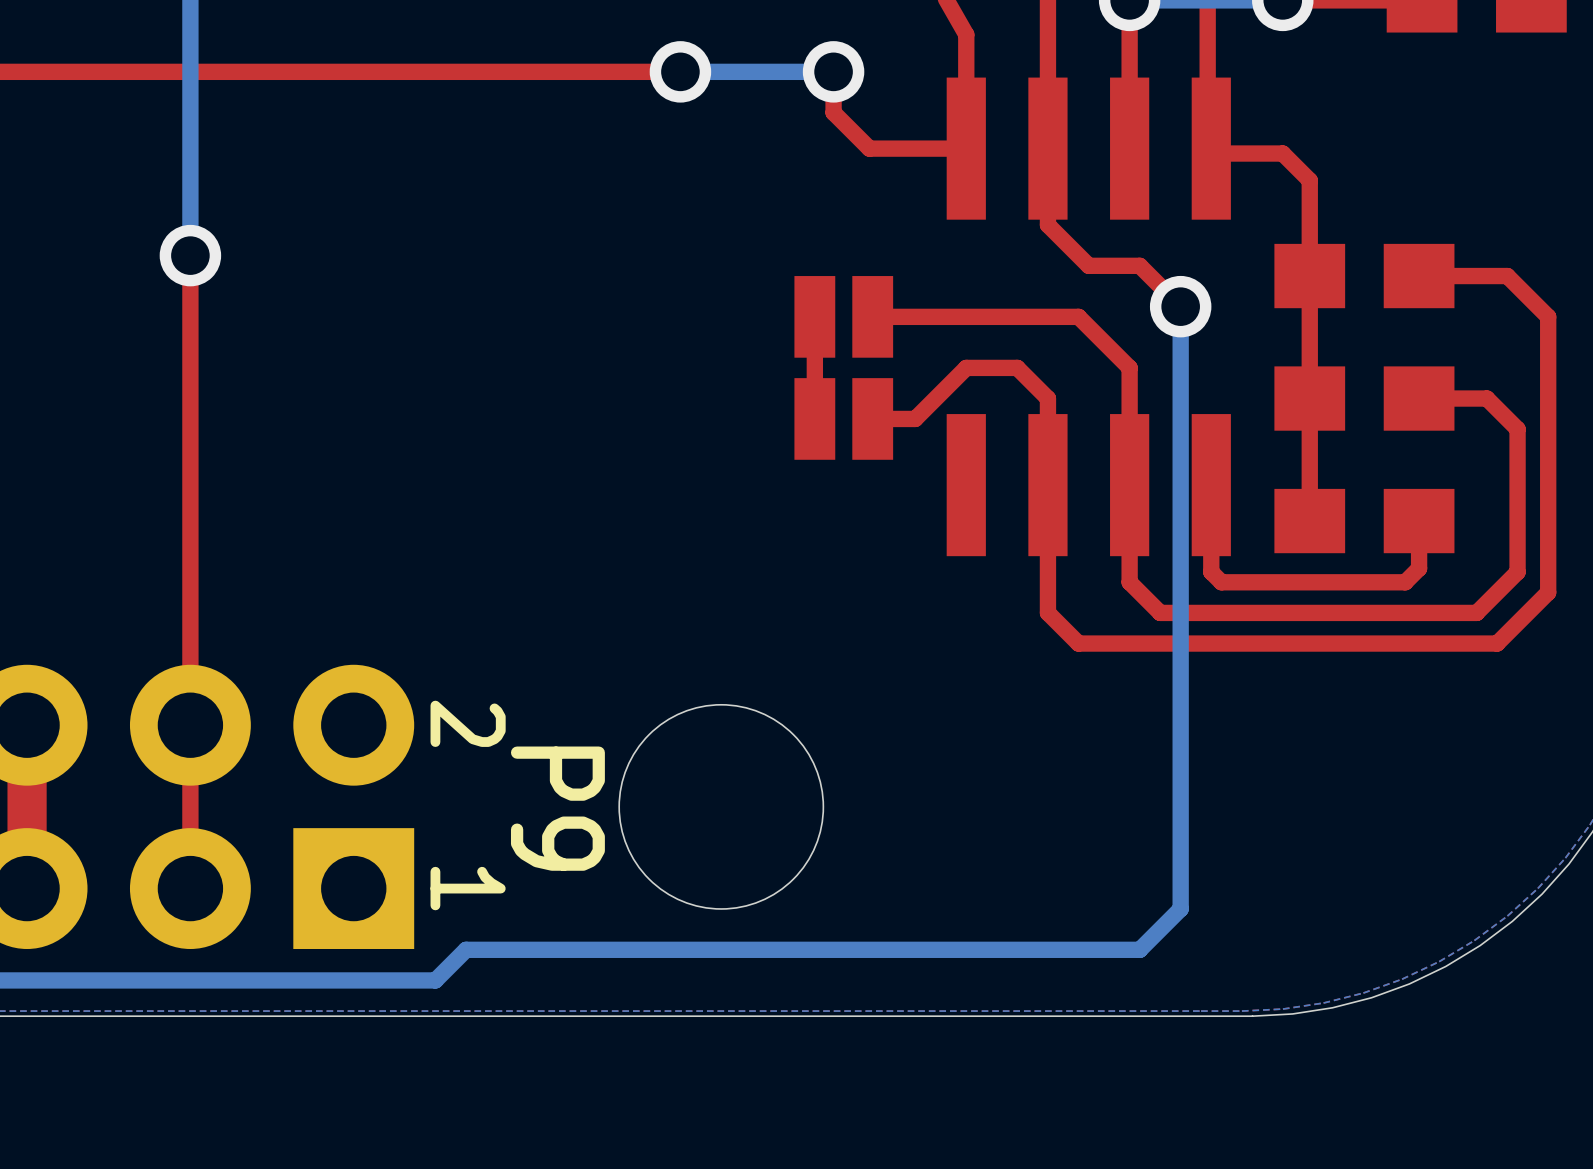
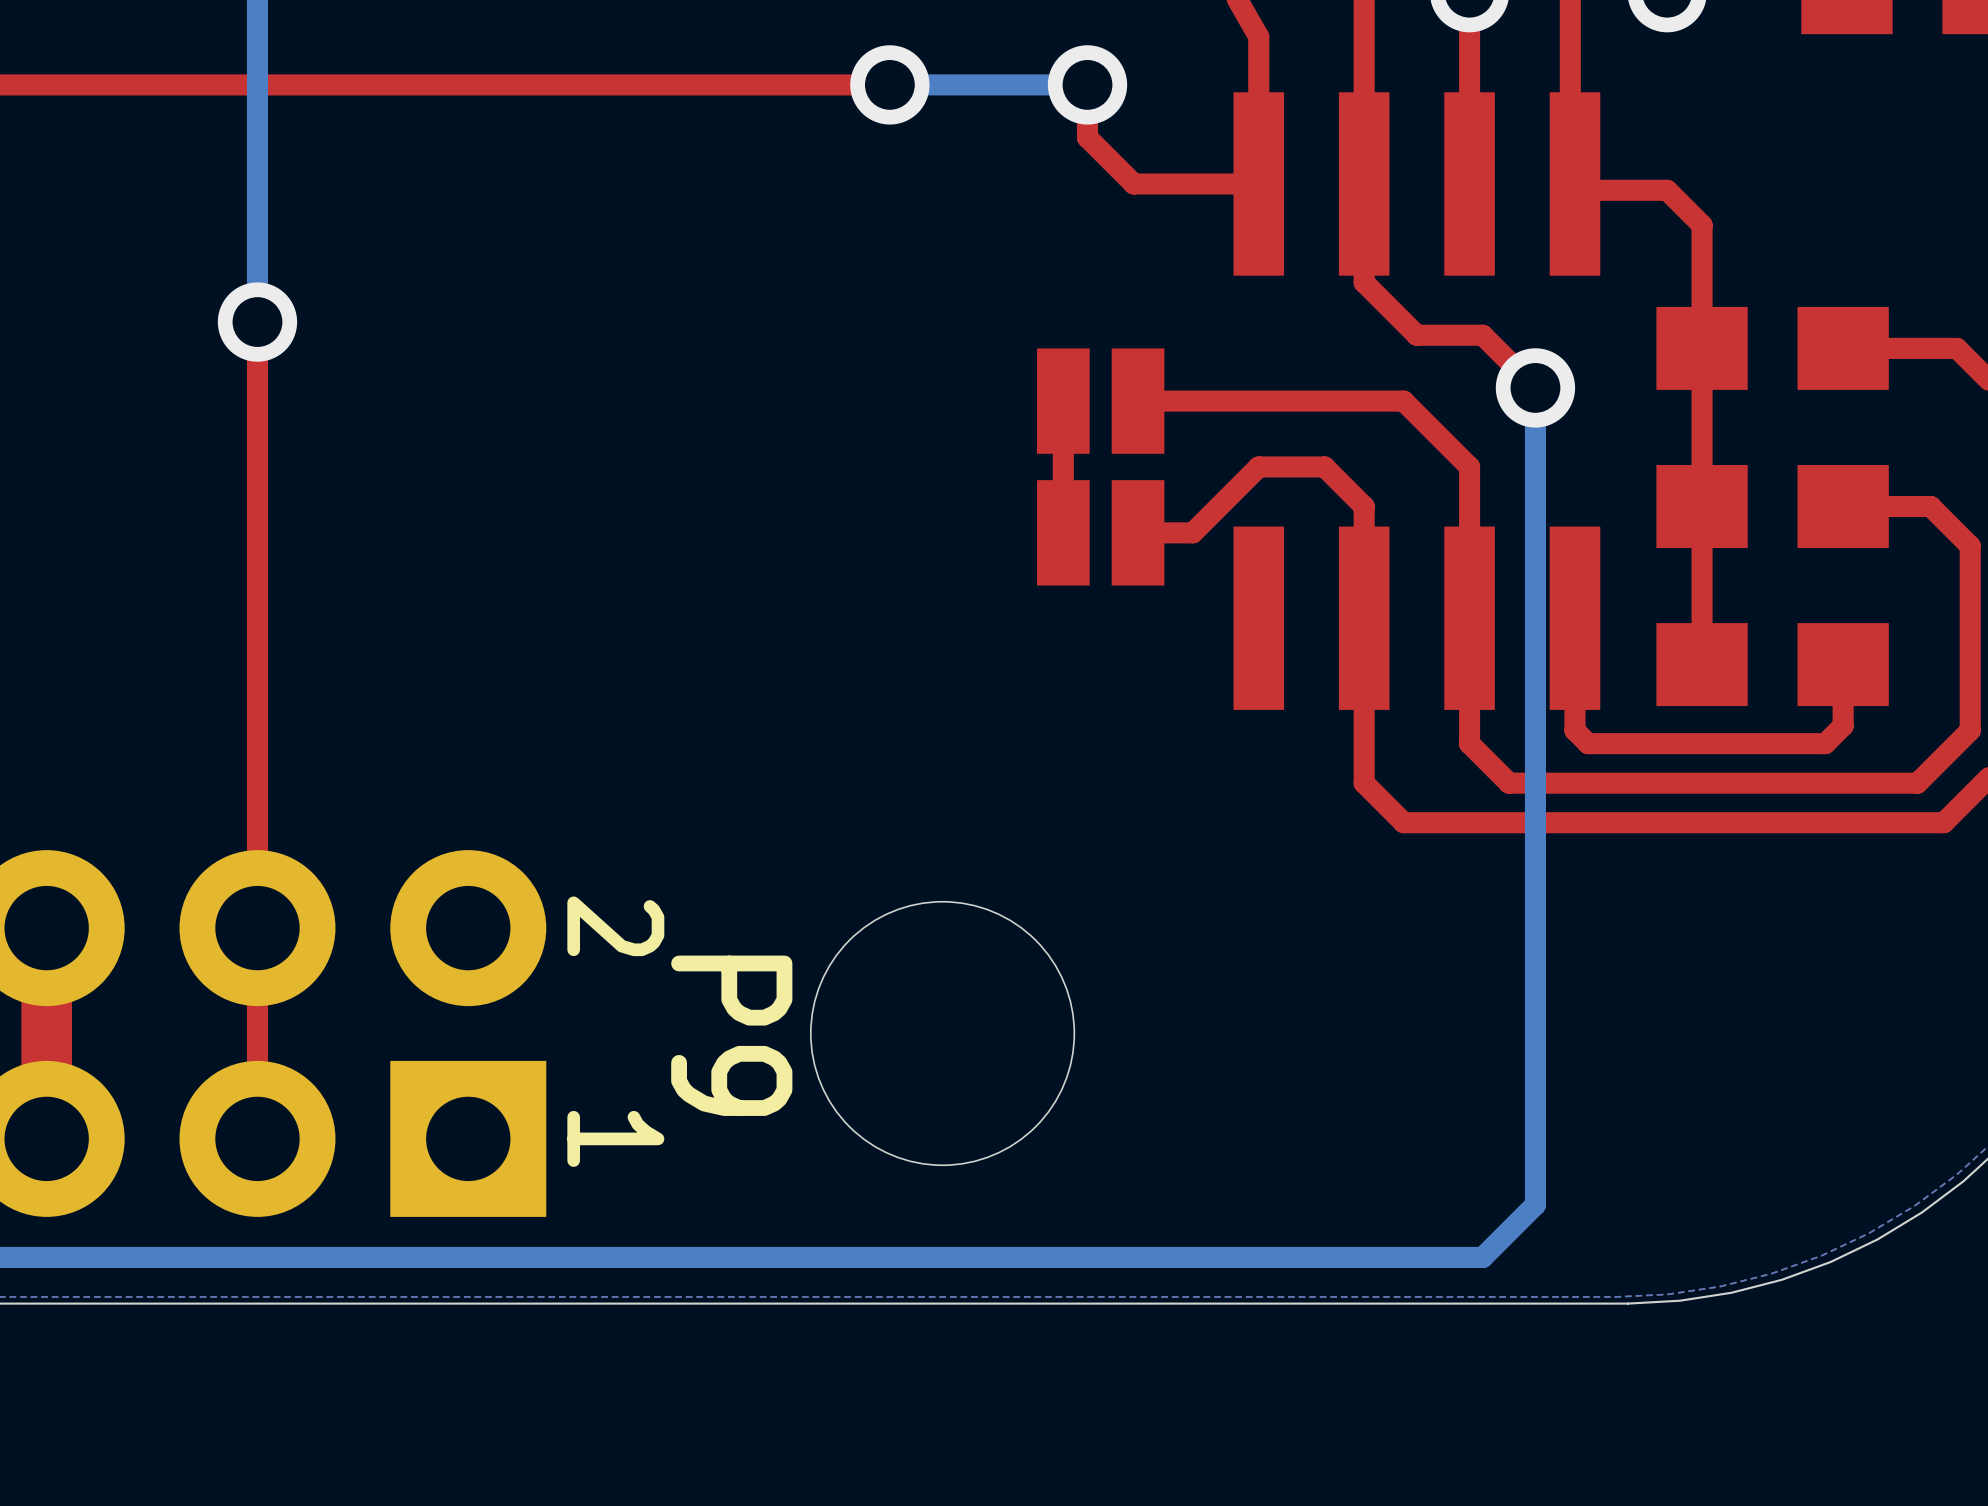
bottom track: (1180, 908) (1139, 949) (466, 949) (435, 980) -> (1535, 1165) (1535, 1204) (1482, 1257) (573, 1257)

